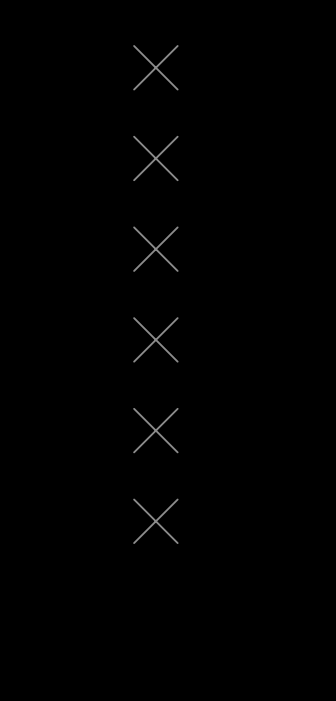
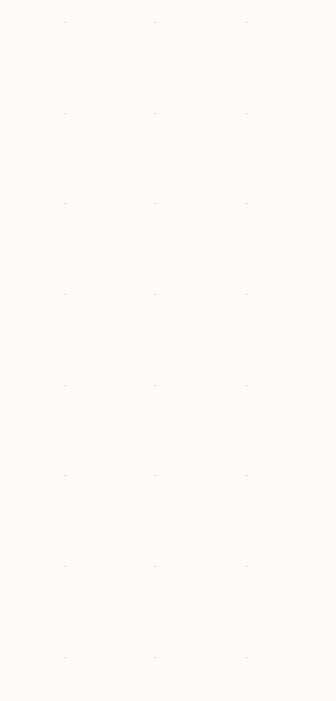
no-connect mark: (155, 67) -> none
no-connect mark: (155, 158) -> none
no-connect mark: (155, 249) -> none
no-connect mark: (155, 339) -> none
no-connect mark: (155, 430) -> none
no-connect mark: (155, 521) -> none

